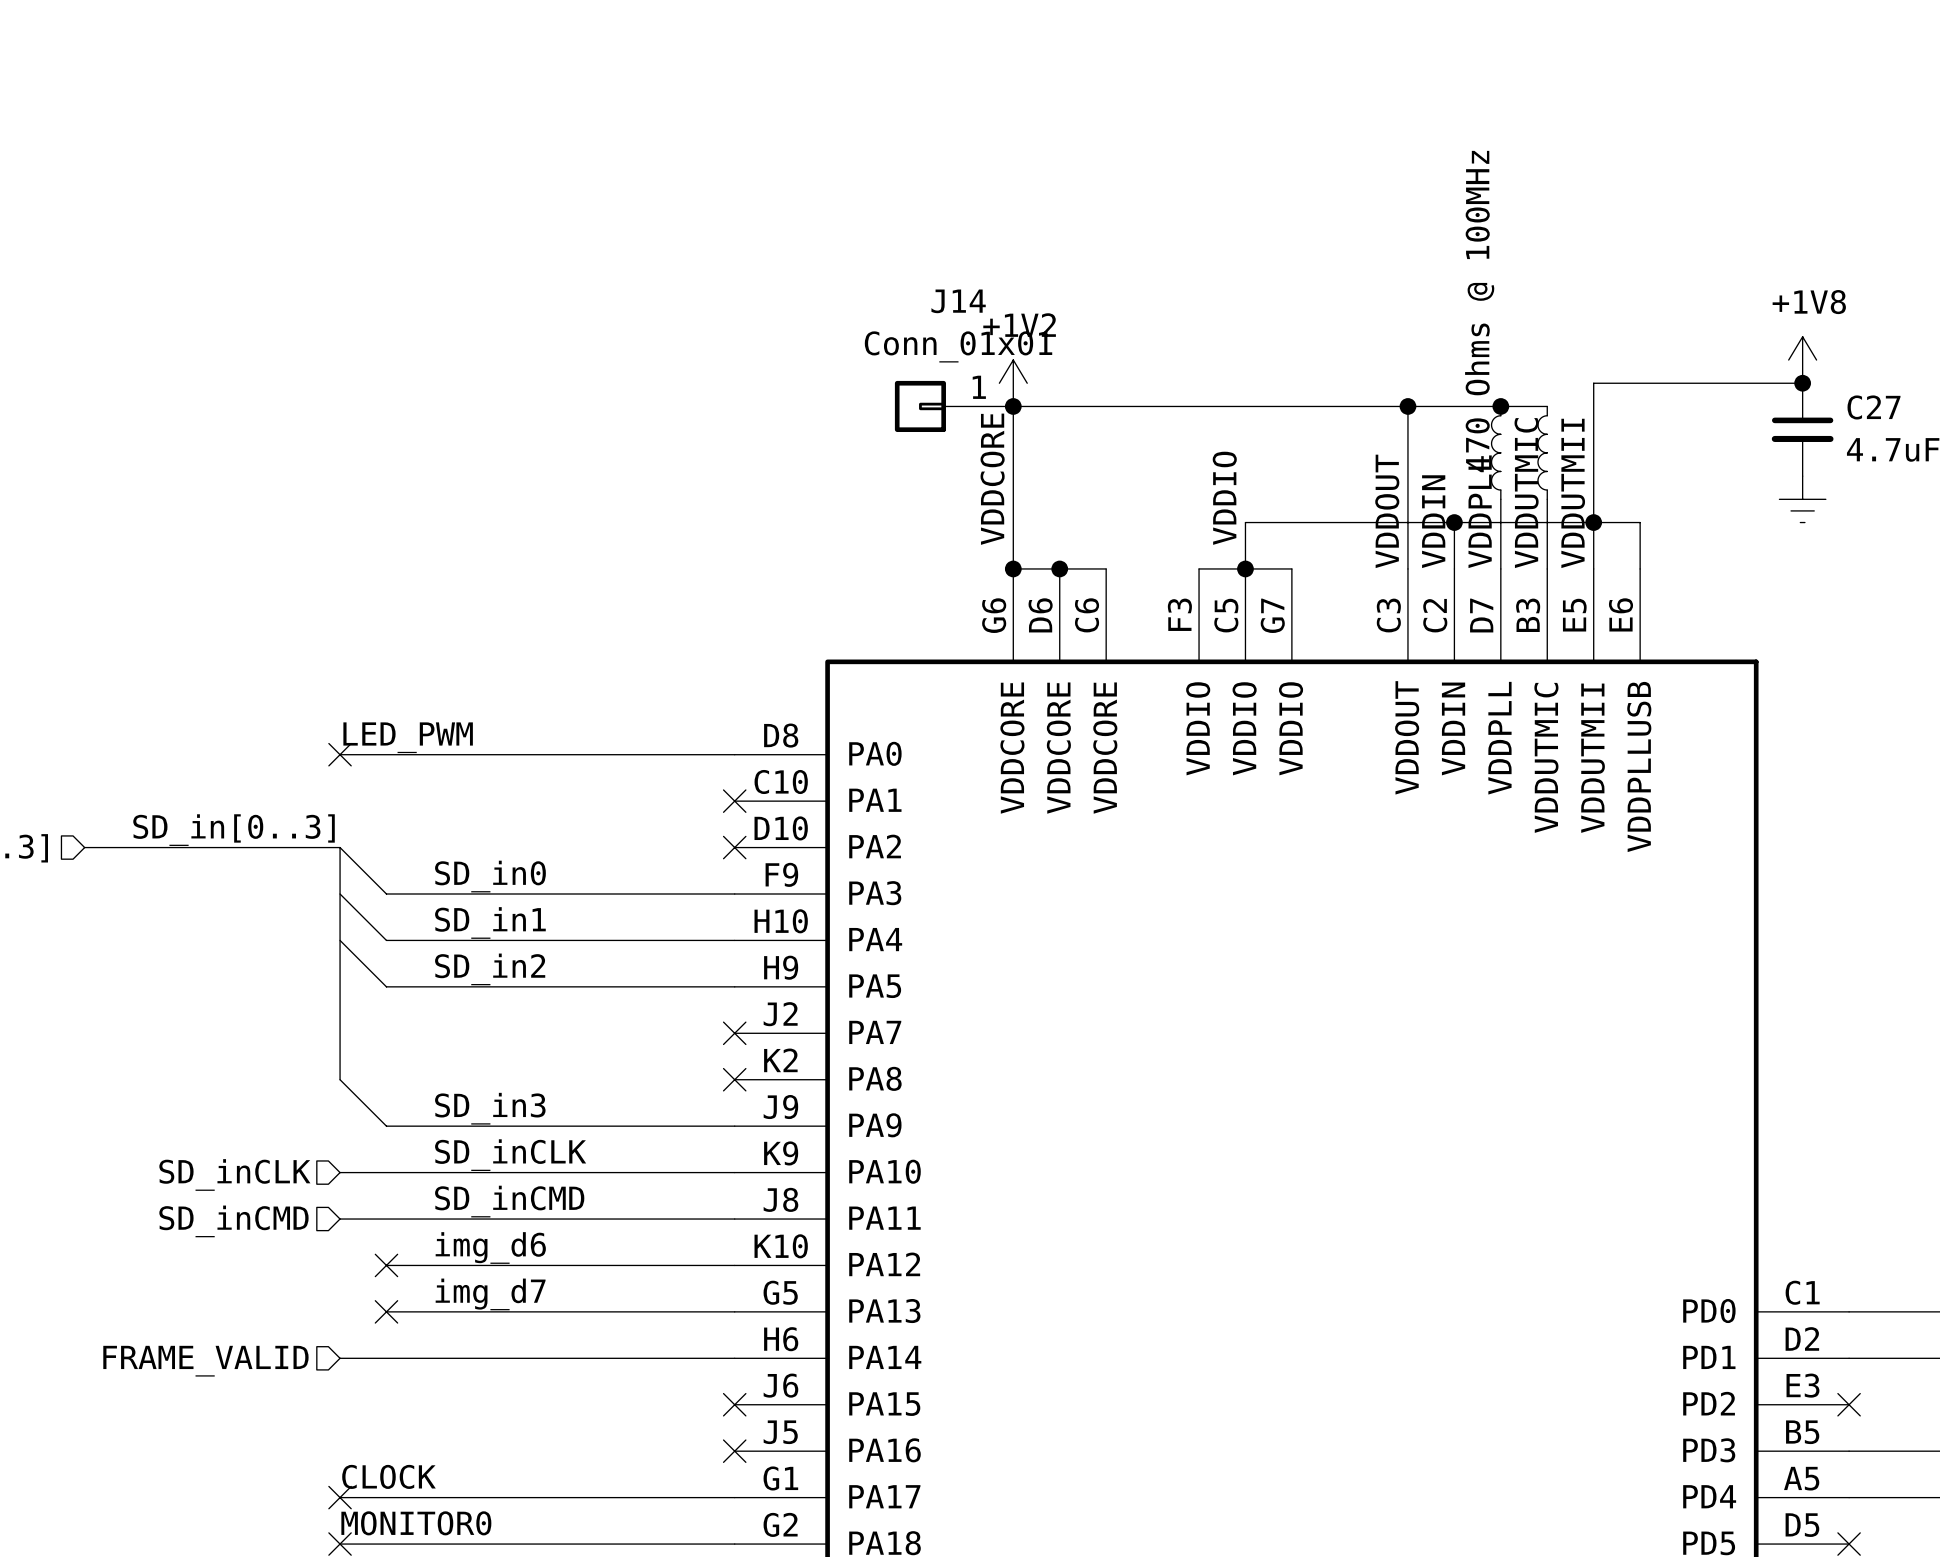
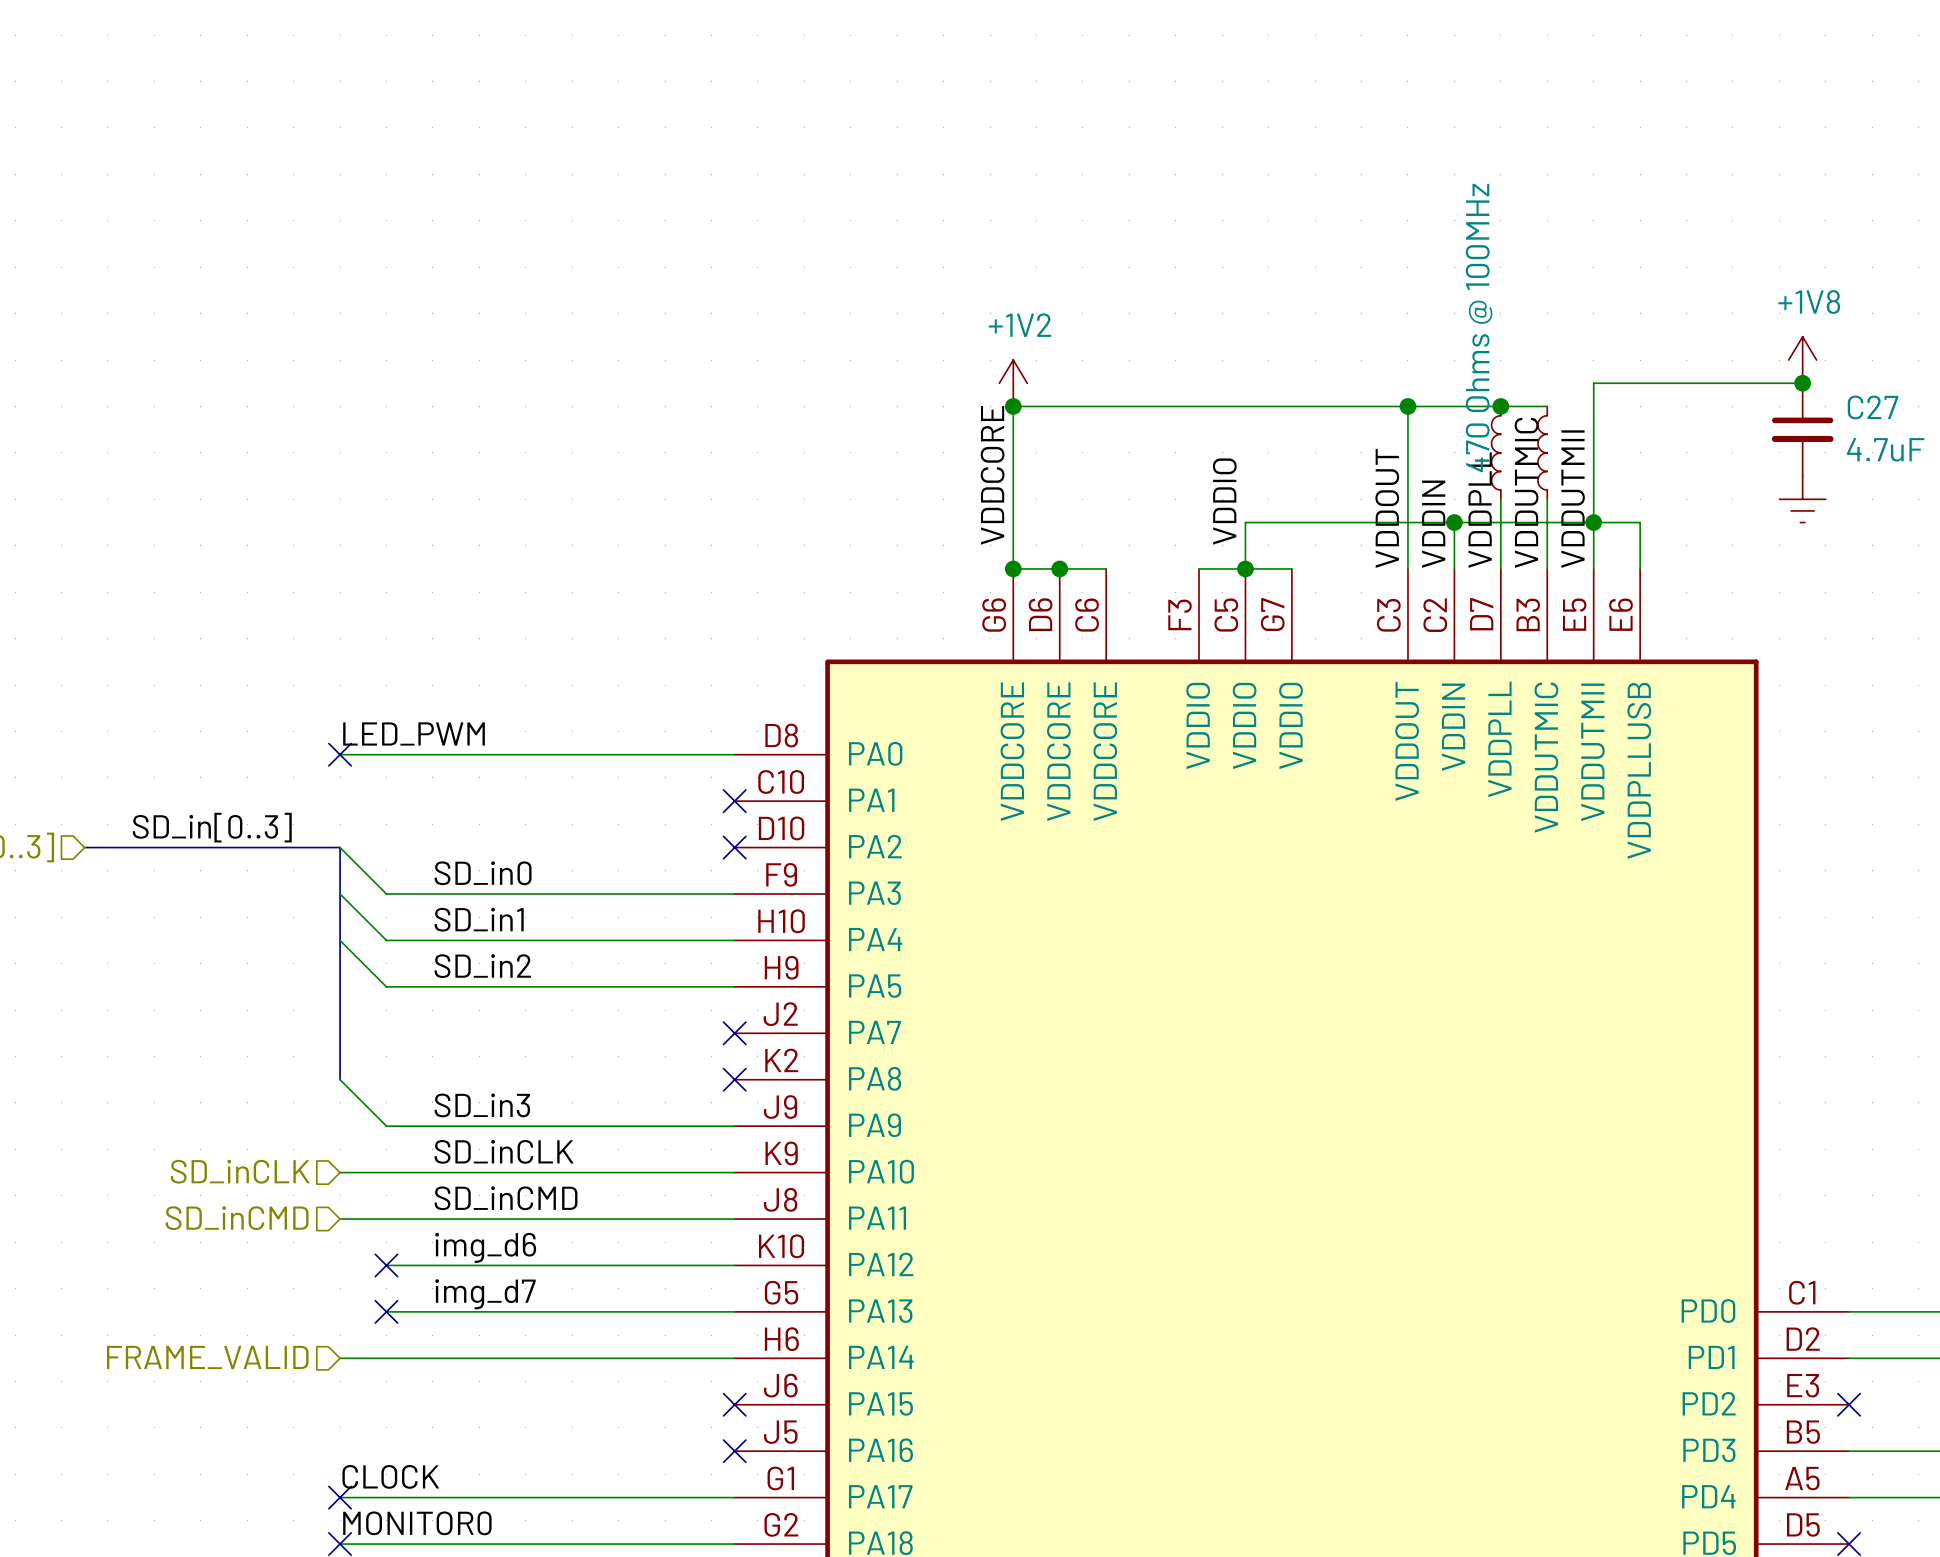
J14: Conn_01x01 (954, 406) -> none

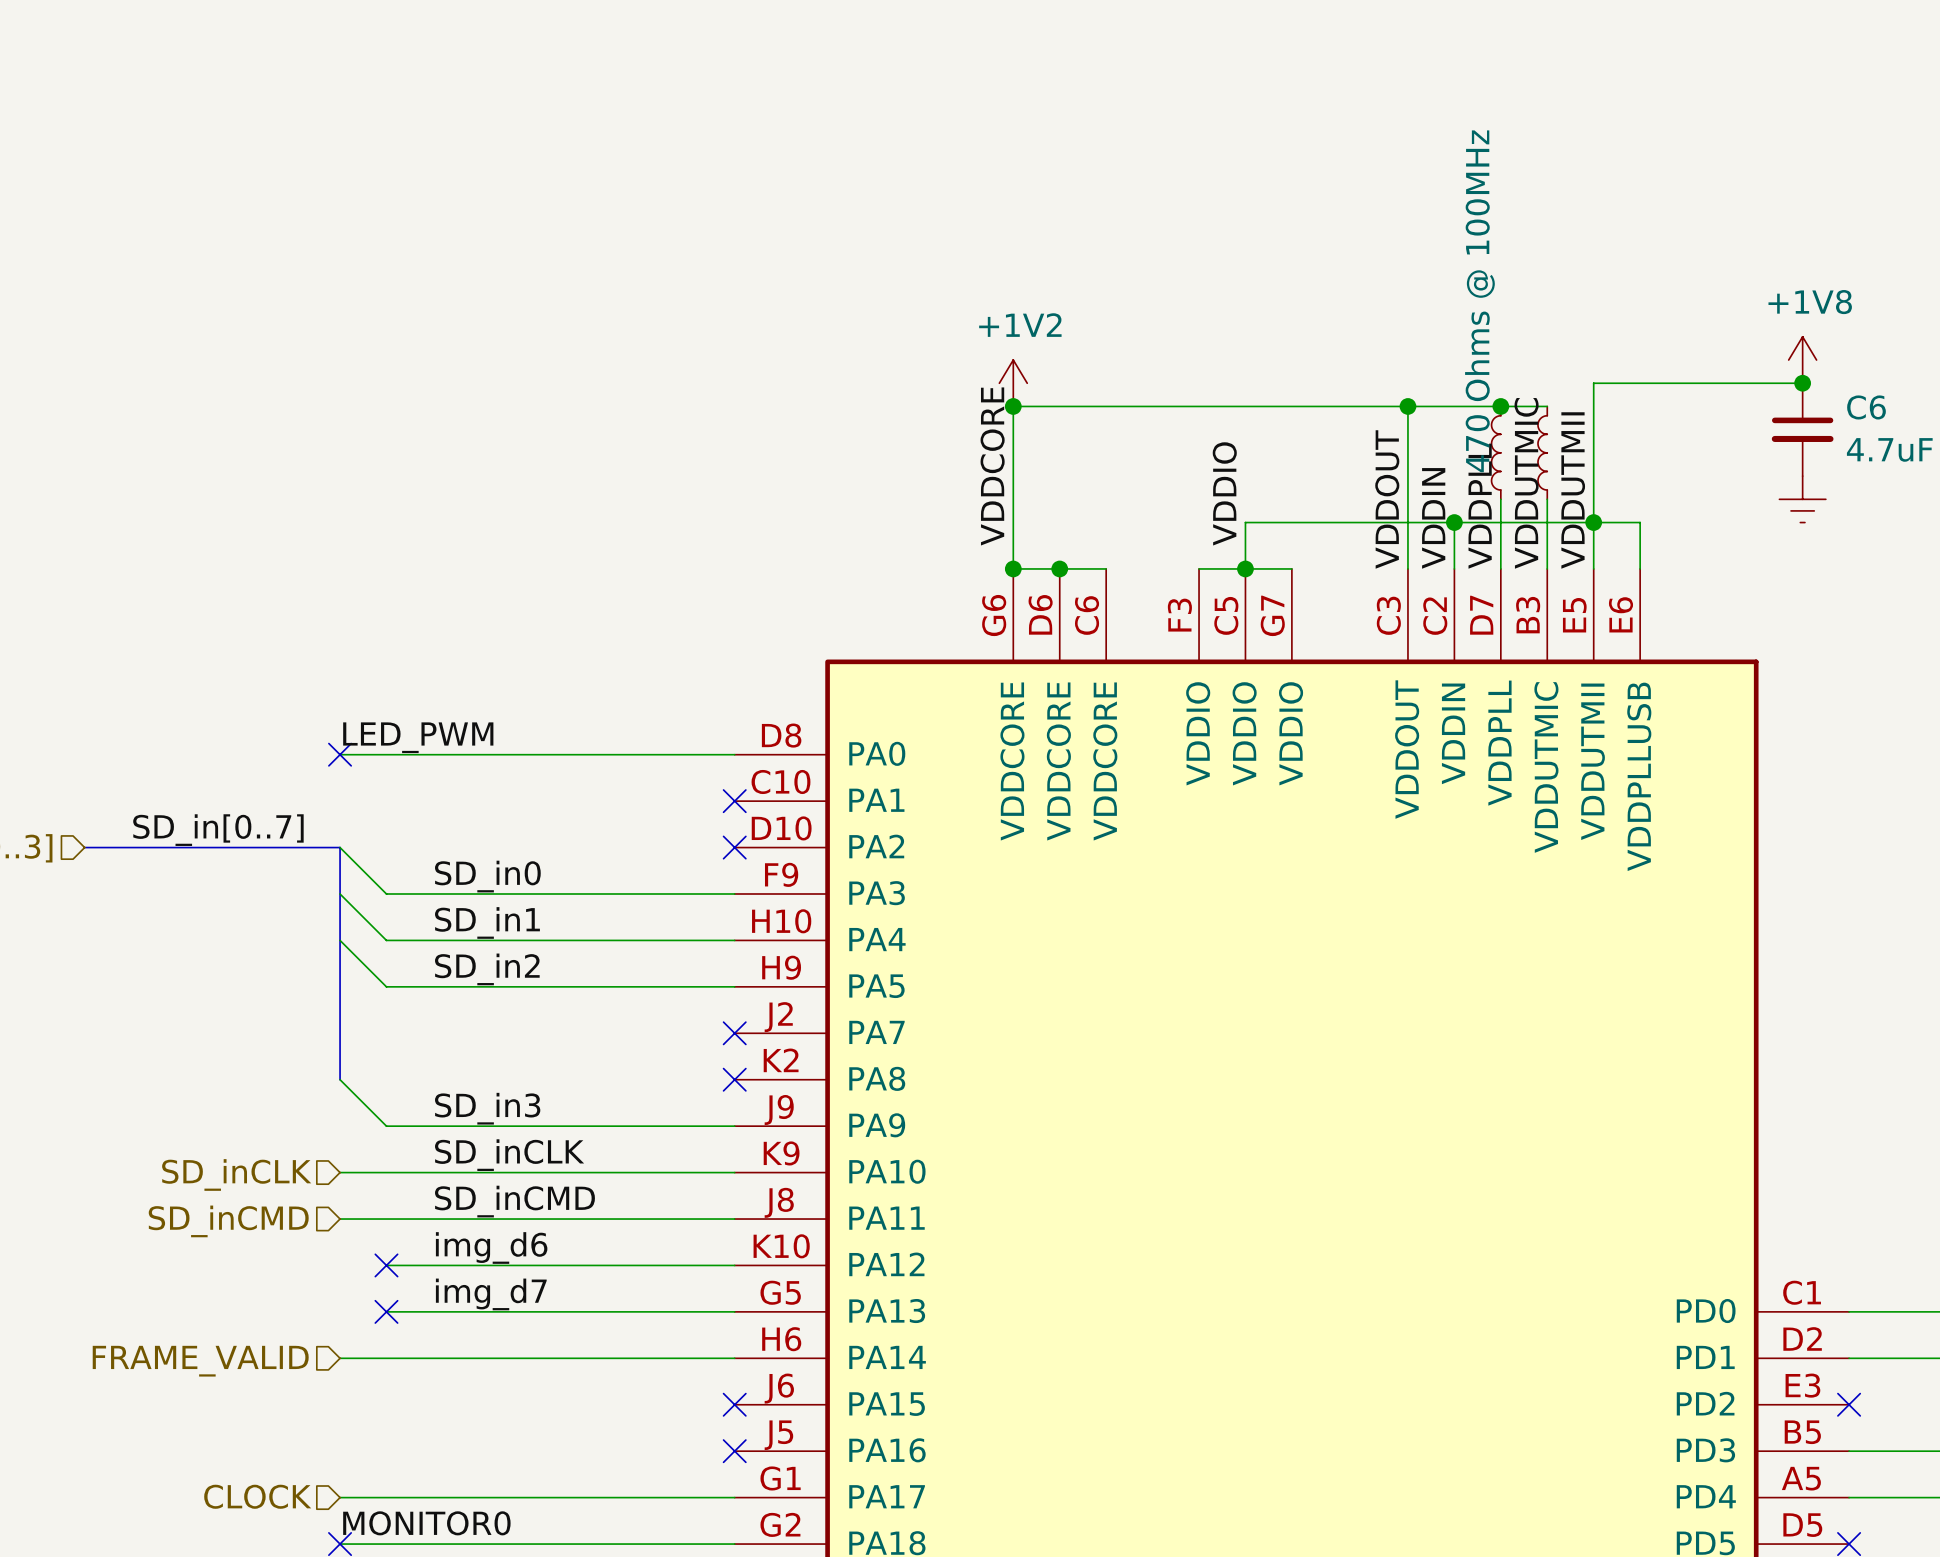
C27 name: C27 (1872, 407) -> C6 (1866, 407)
label: SD_in[0..3] (212, 827) -> SD_in[0..7] (218, 830)
label: CLOCK (390, 1476) -> none
hierarchical label: none -> CLOCK (257, 1496)
no-connect mark: (340, 1497) -> none

